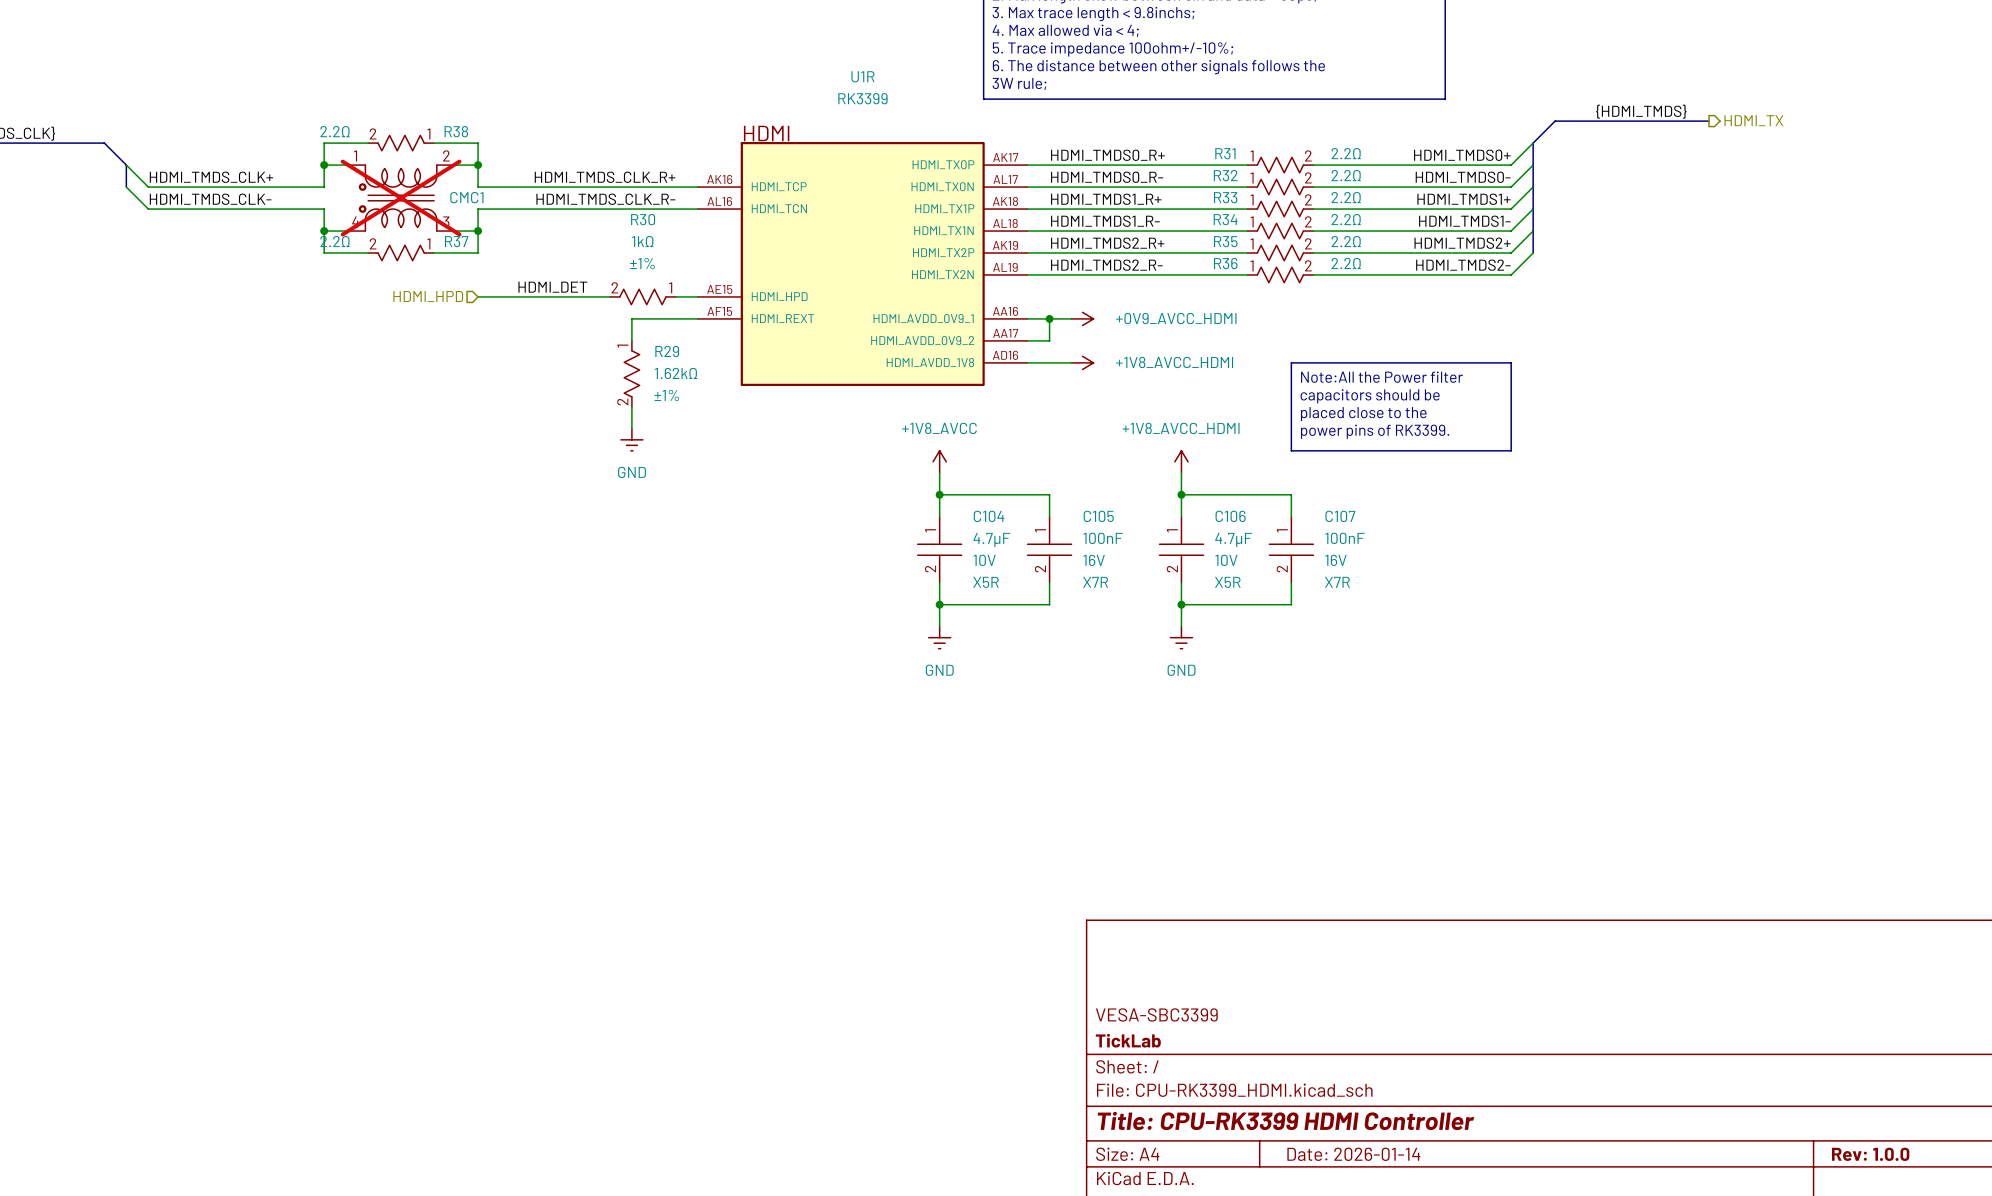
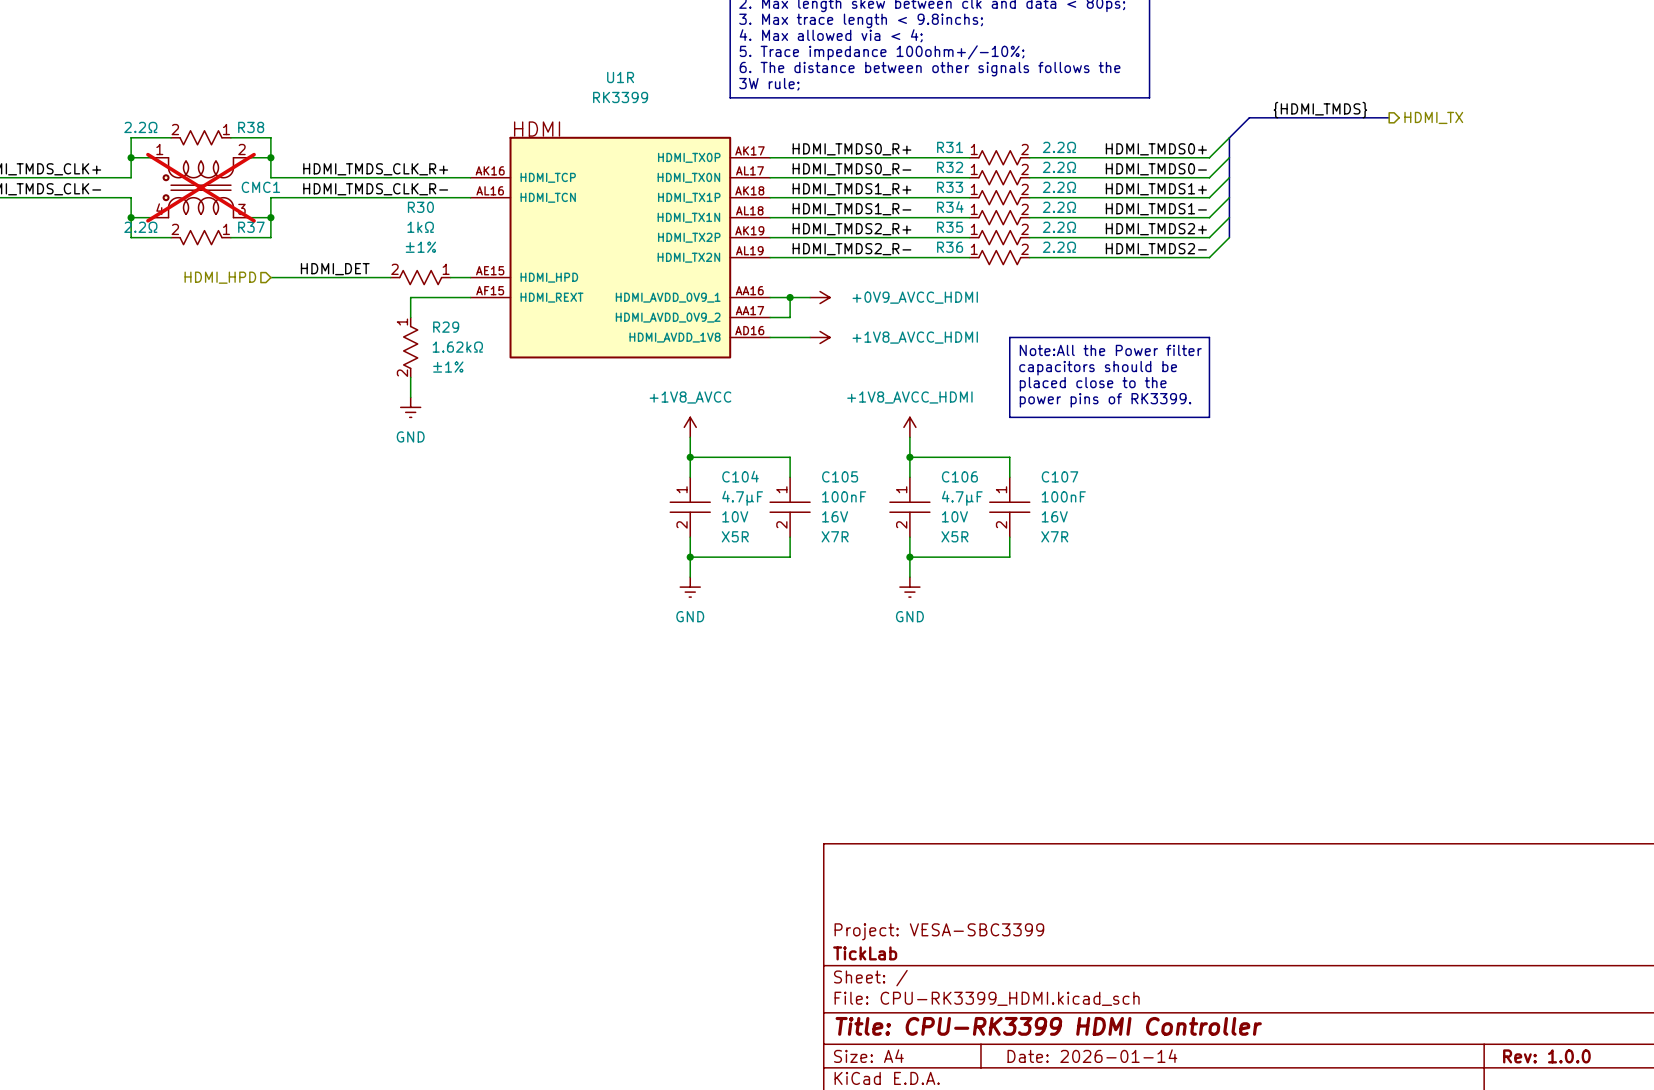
title block: VESA-SBC3399 (1156, 1014) -> Project: VESA-SBC3399 (939, 931)

